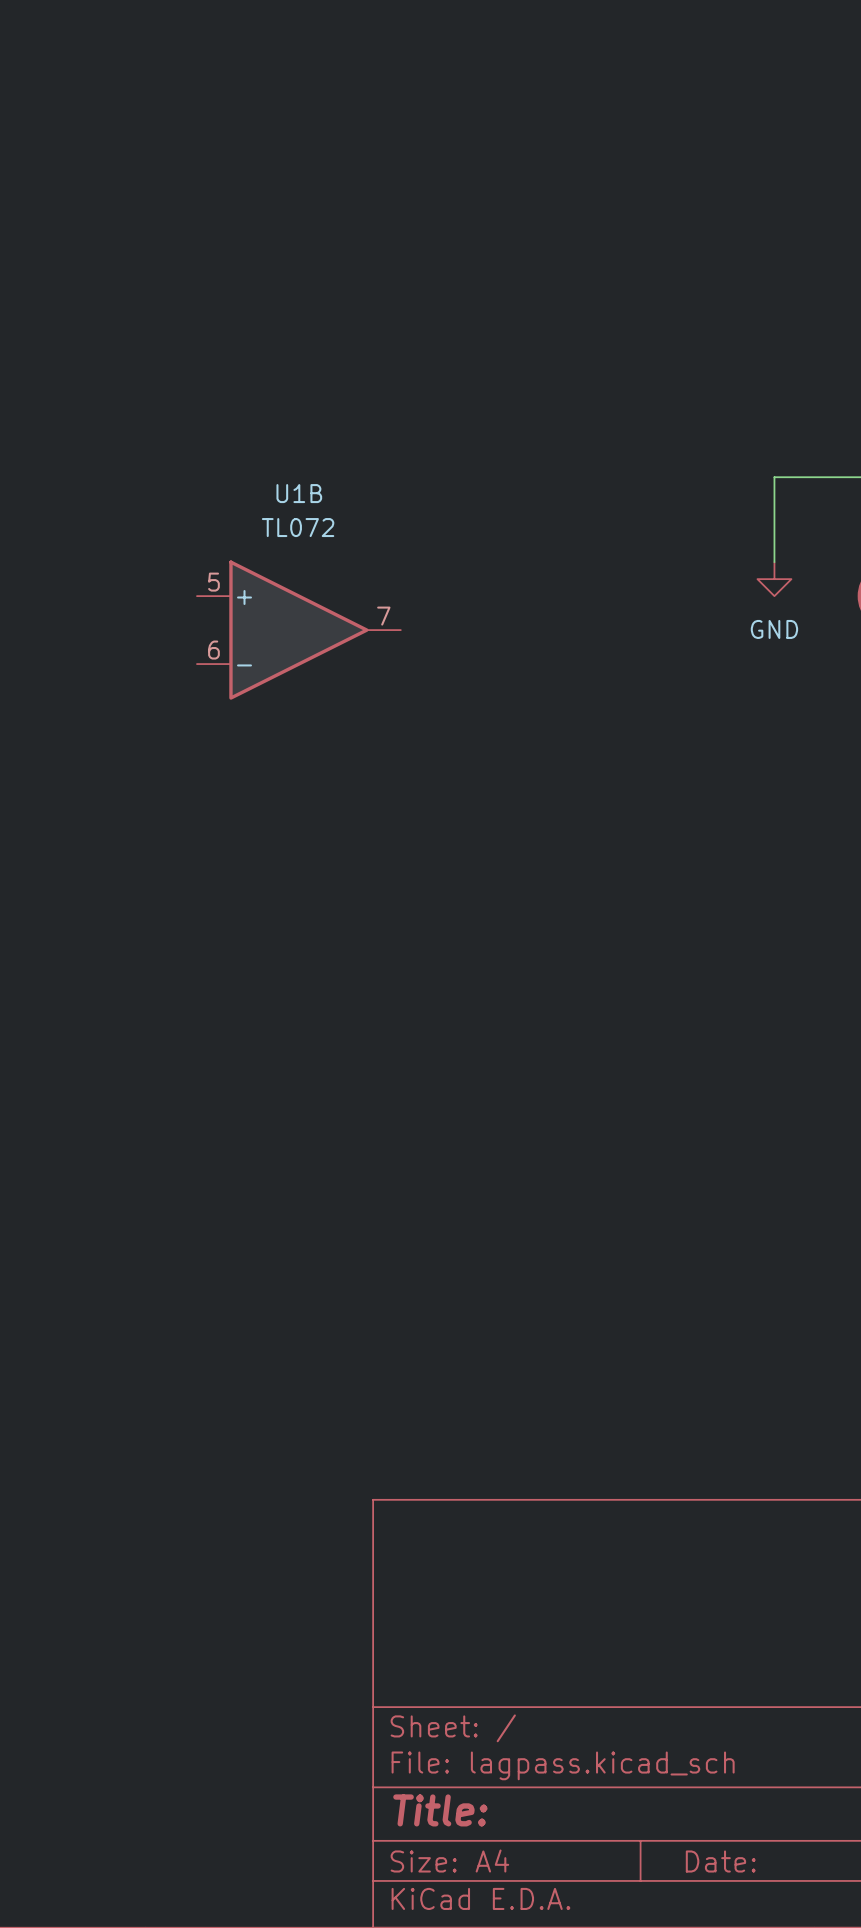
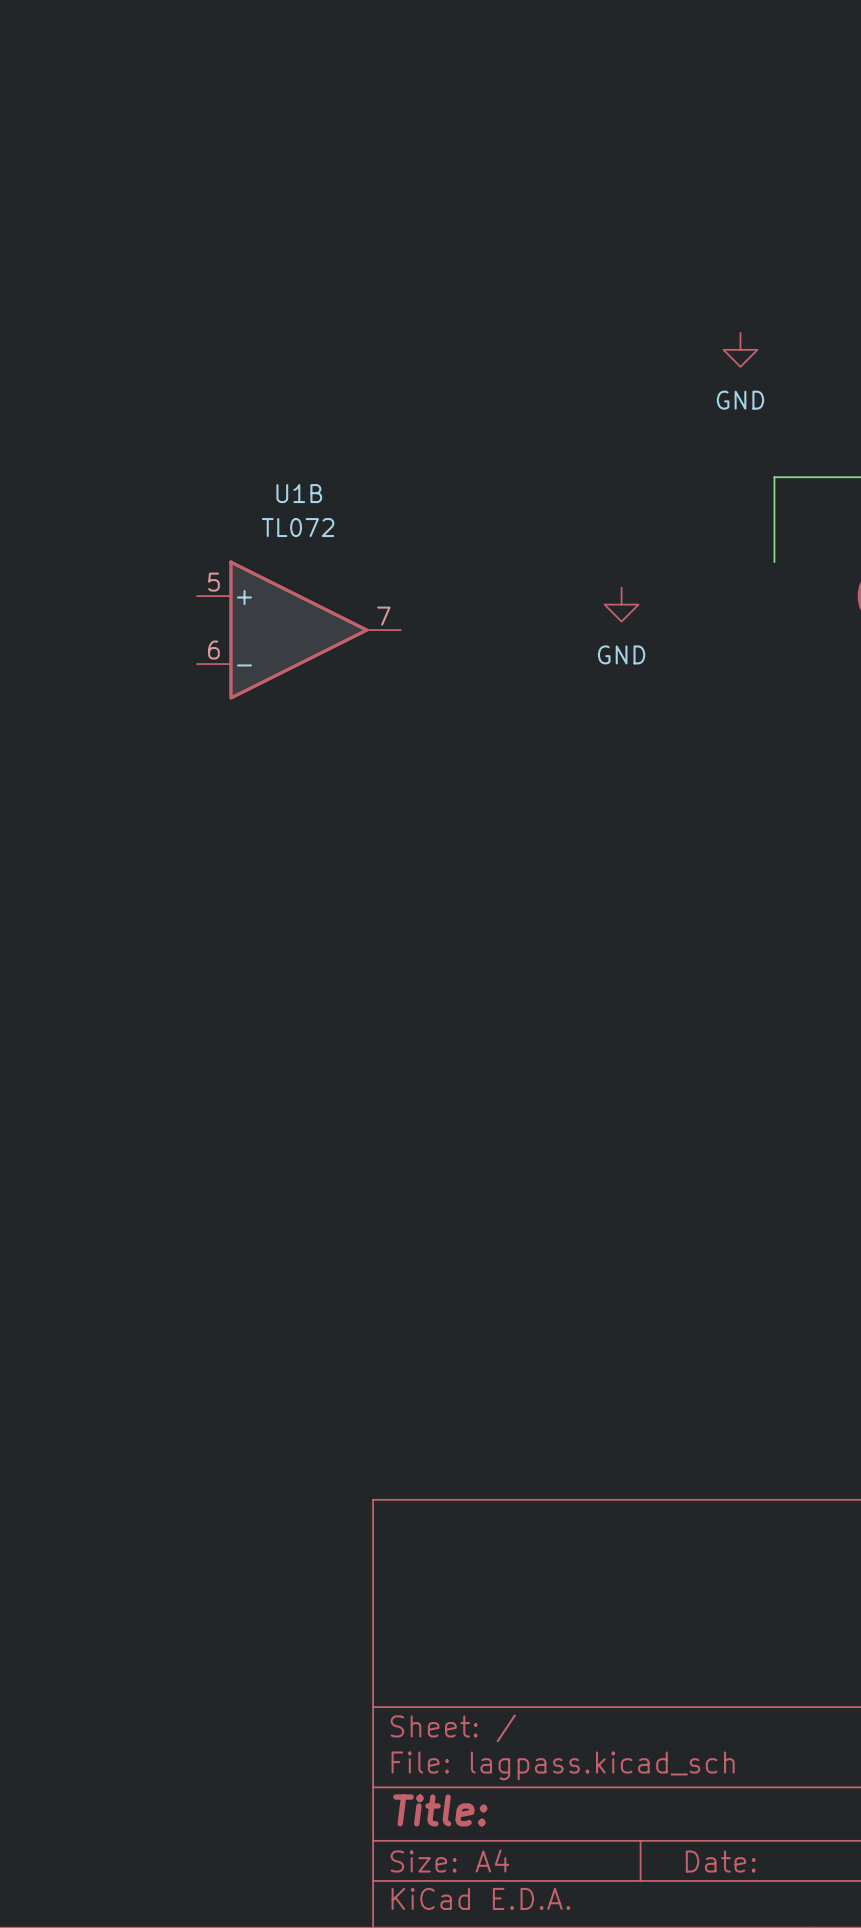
power symbol: none -> GND (740, 349)
power symbol: GND (774, 579) -> none
power symbol: none -> GND (621, 604)

